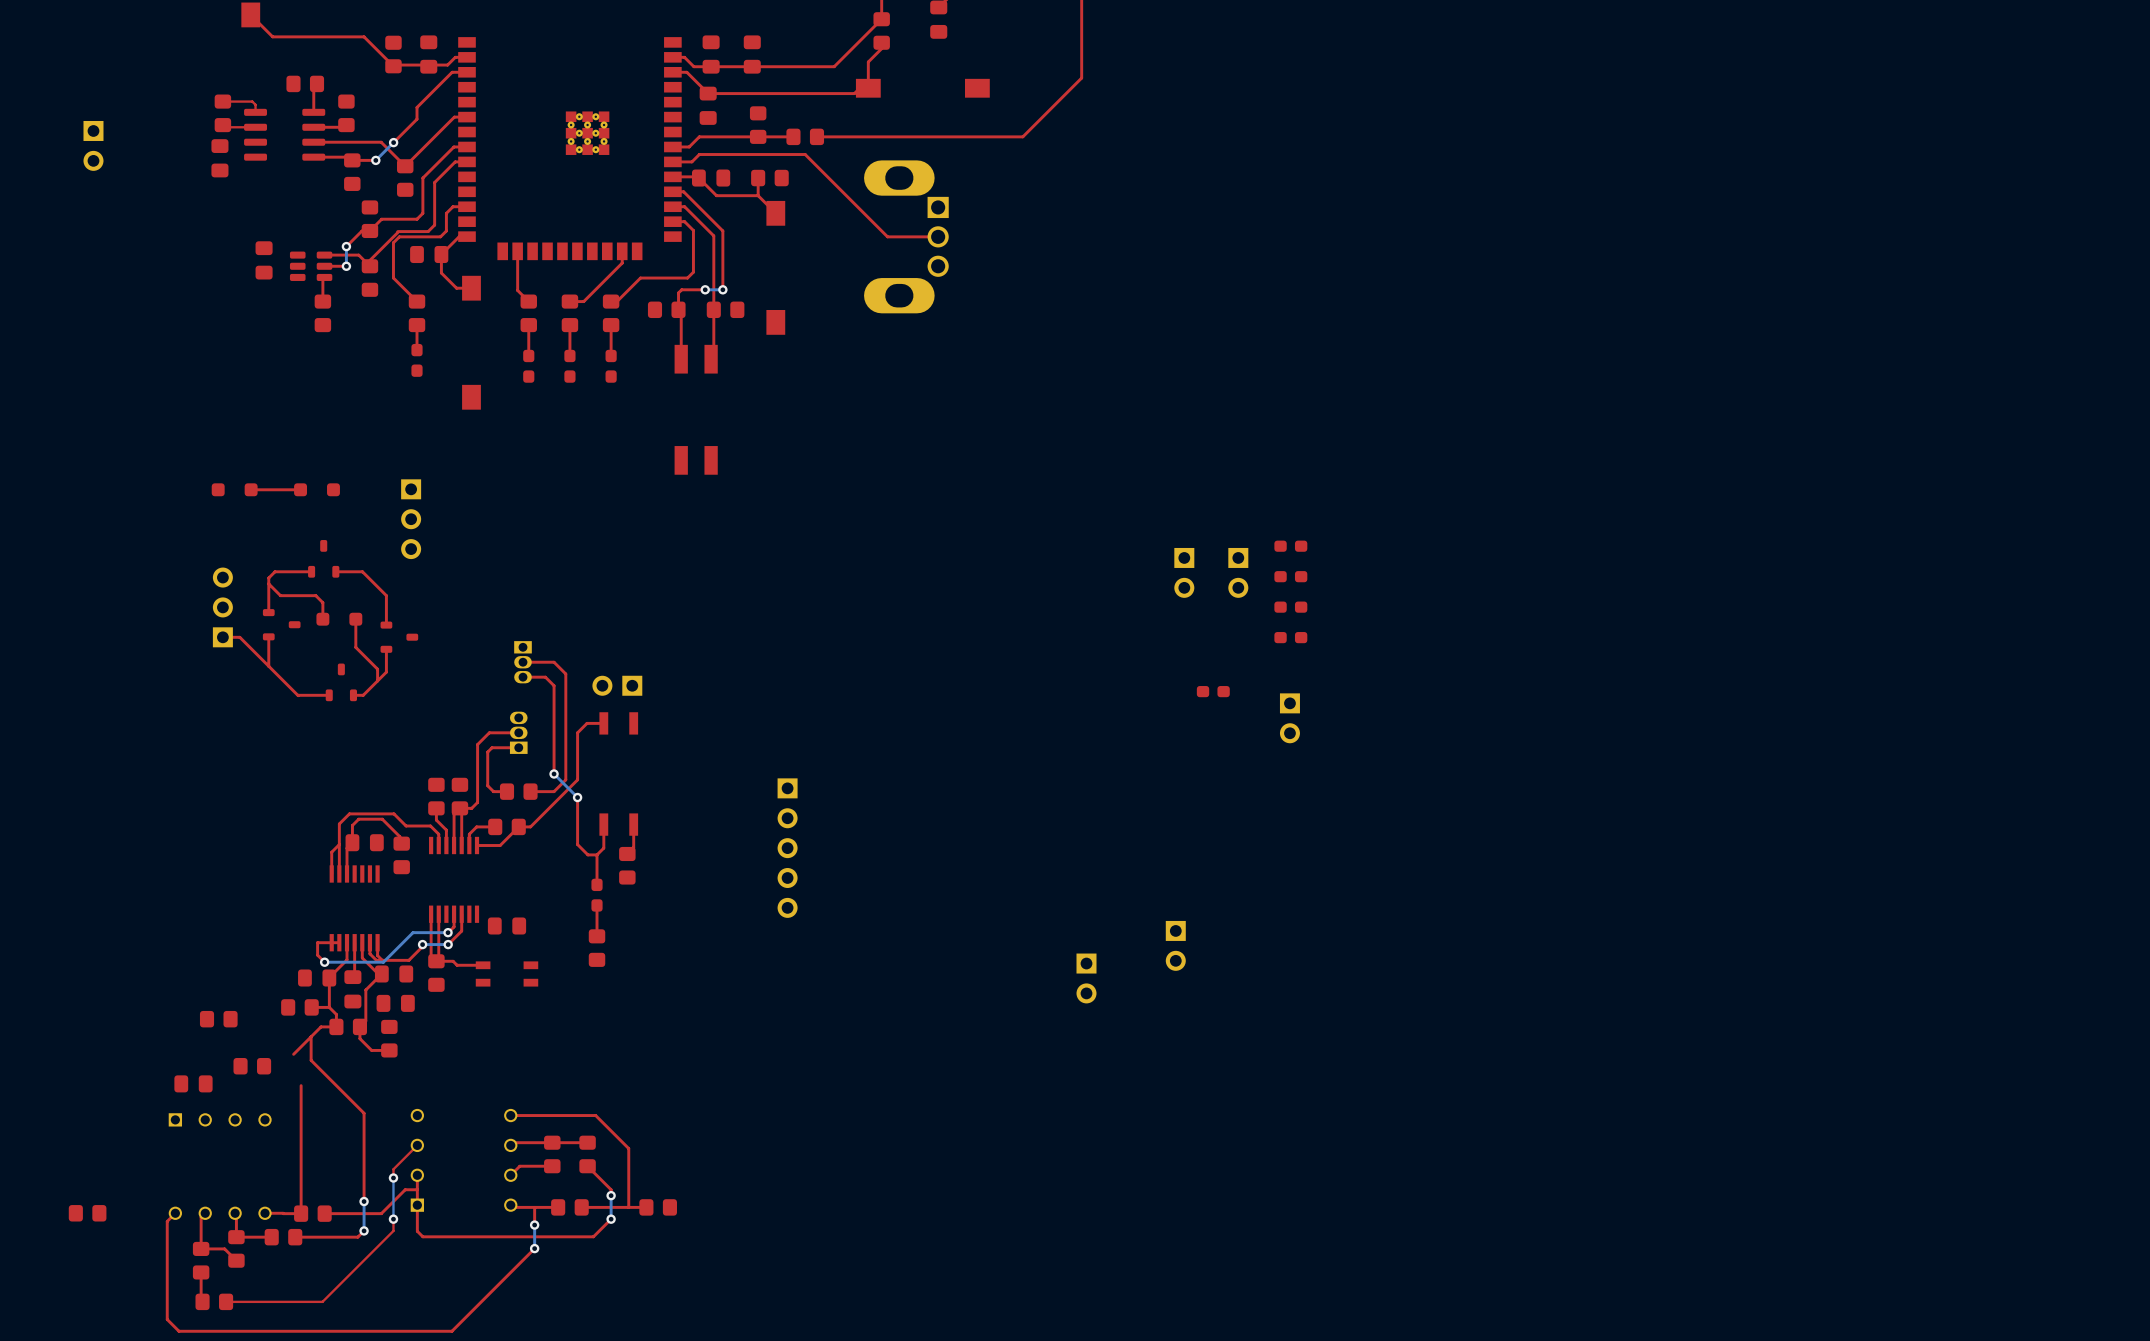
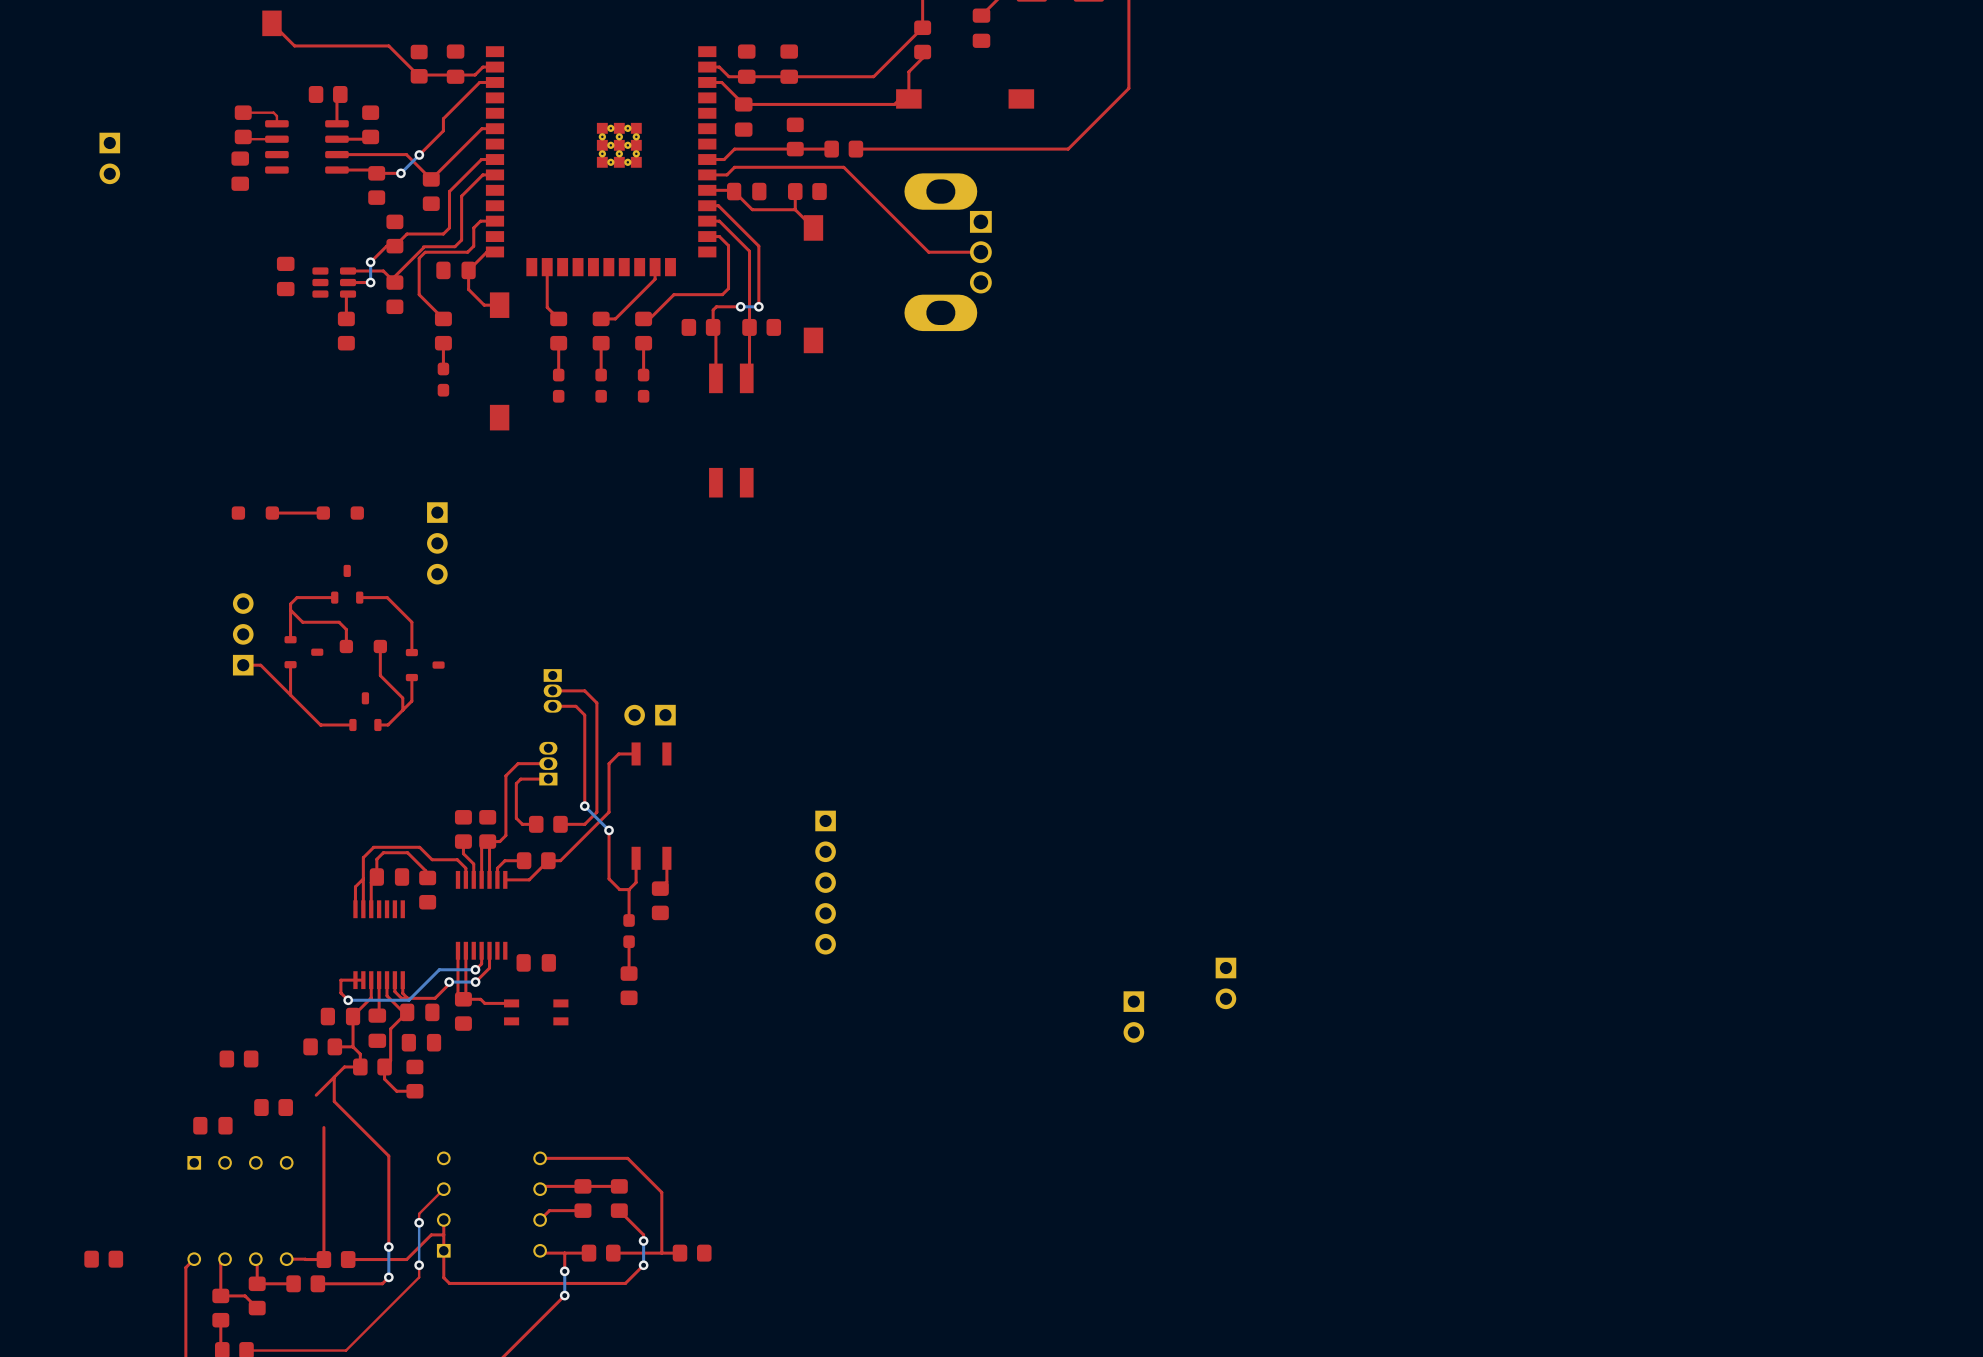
part: (1290, 546) -> none
part: (1184, 572) -> none
part: (1238, 572) -> none
part: (1290, 576) -> none
part: (1290, 607) -> none
part: (1290, 637) -> none
part: (1213, 691) -> none
part: (1289, 718) -> none

